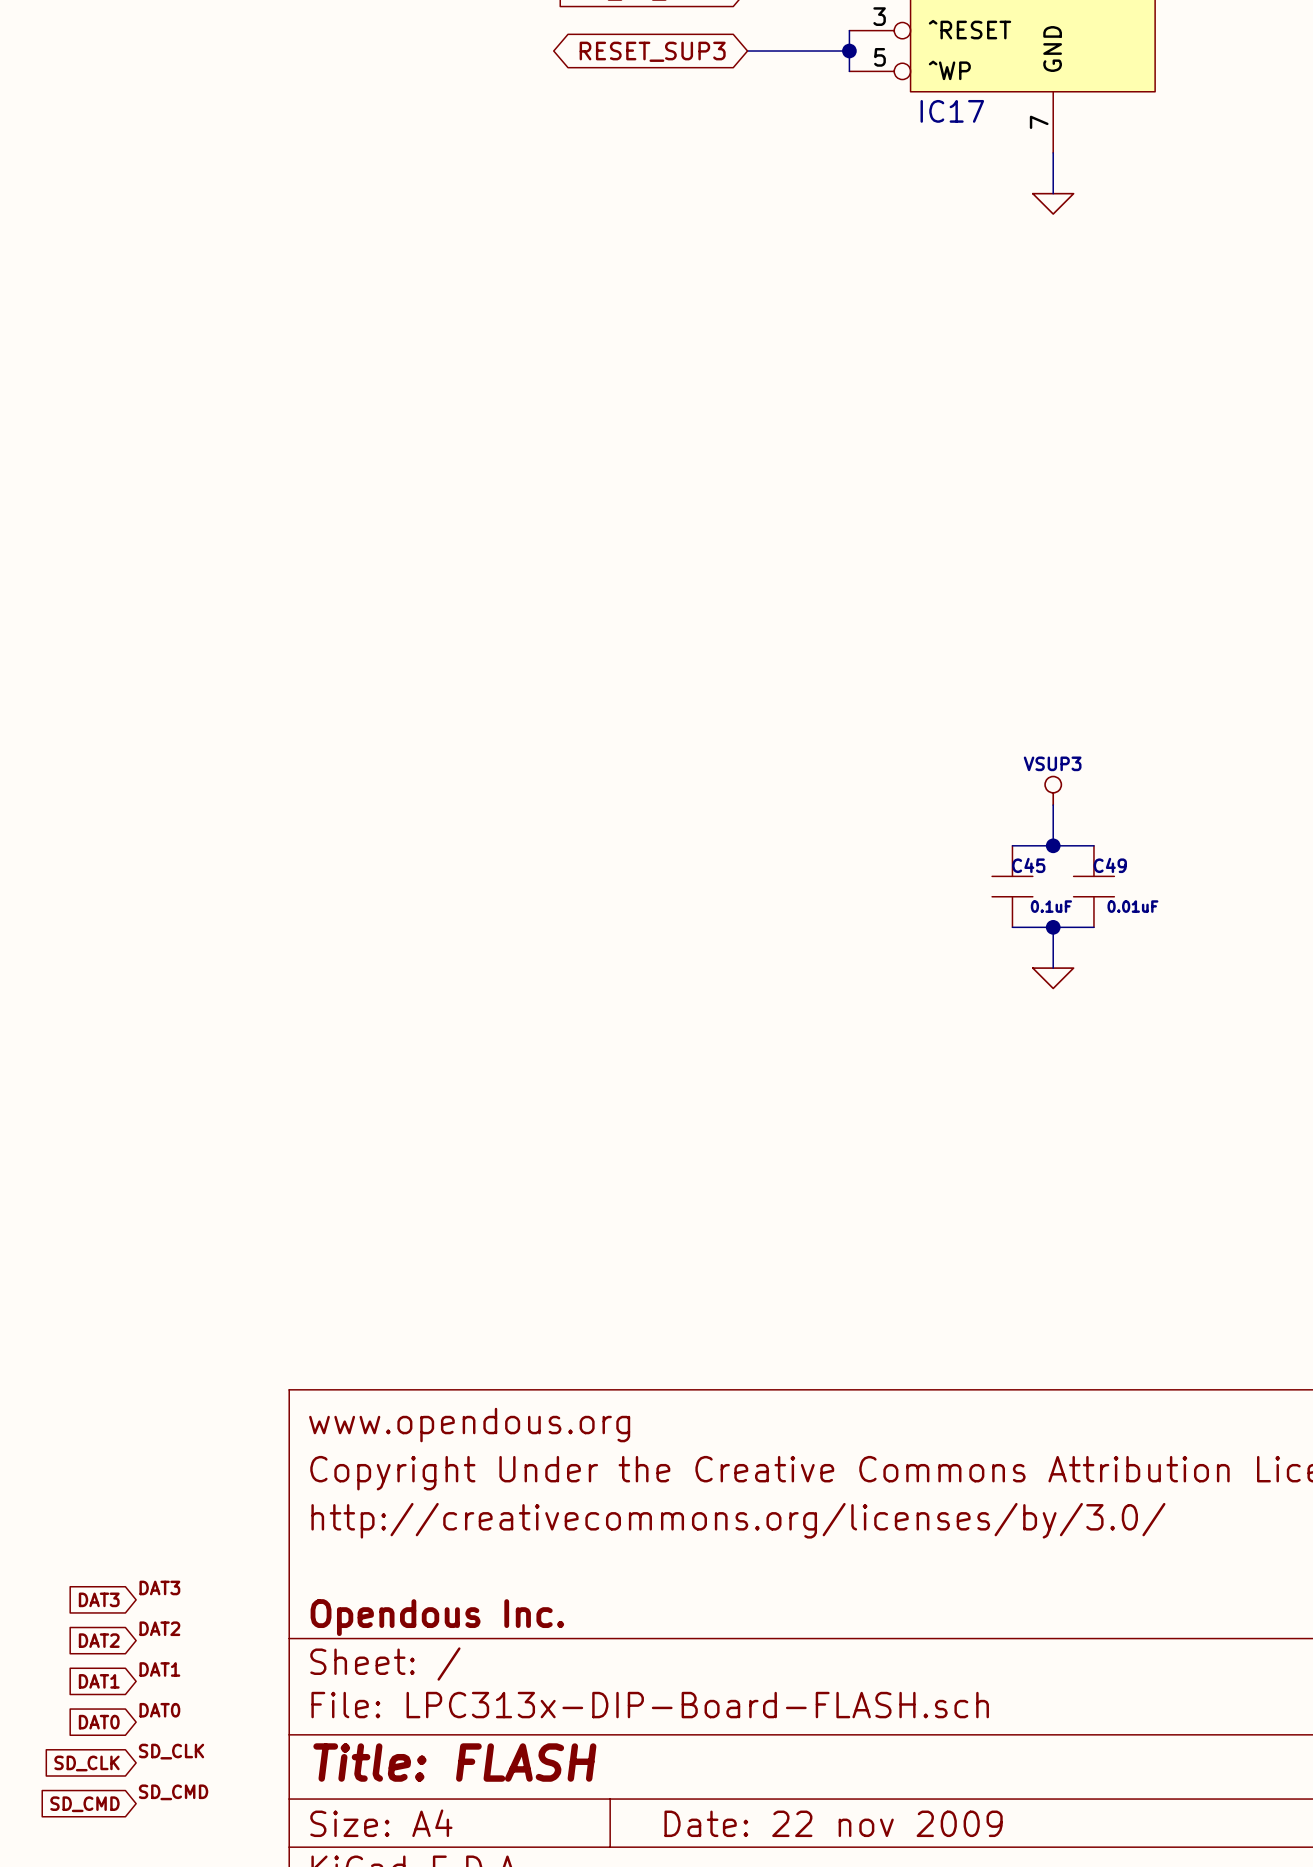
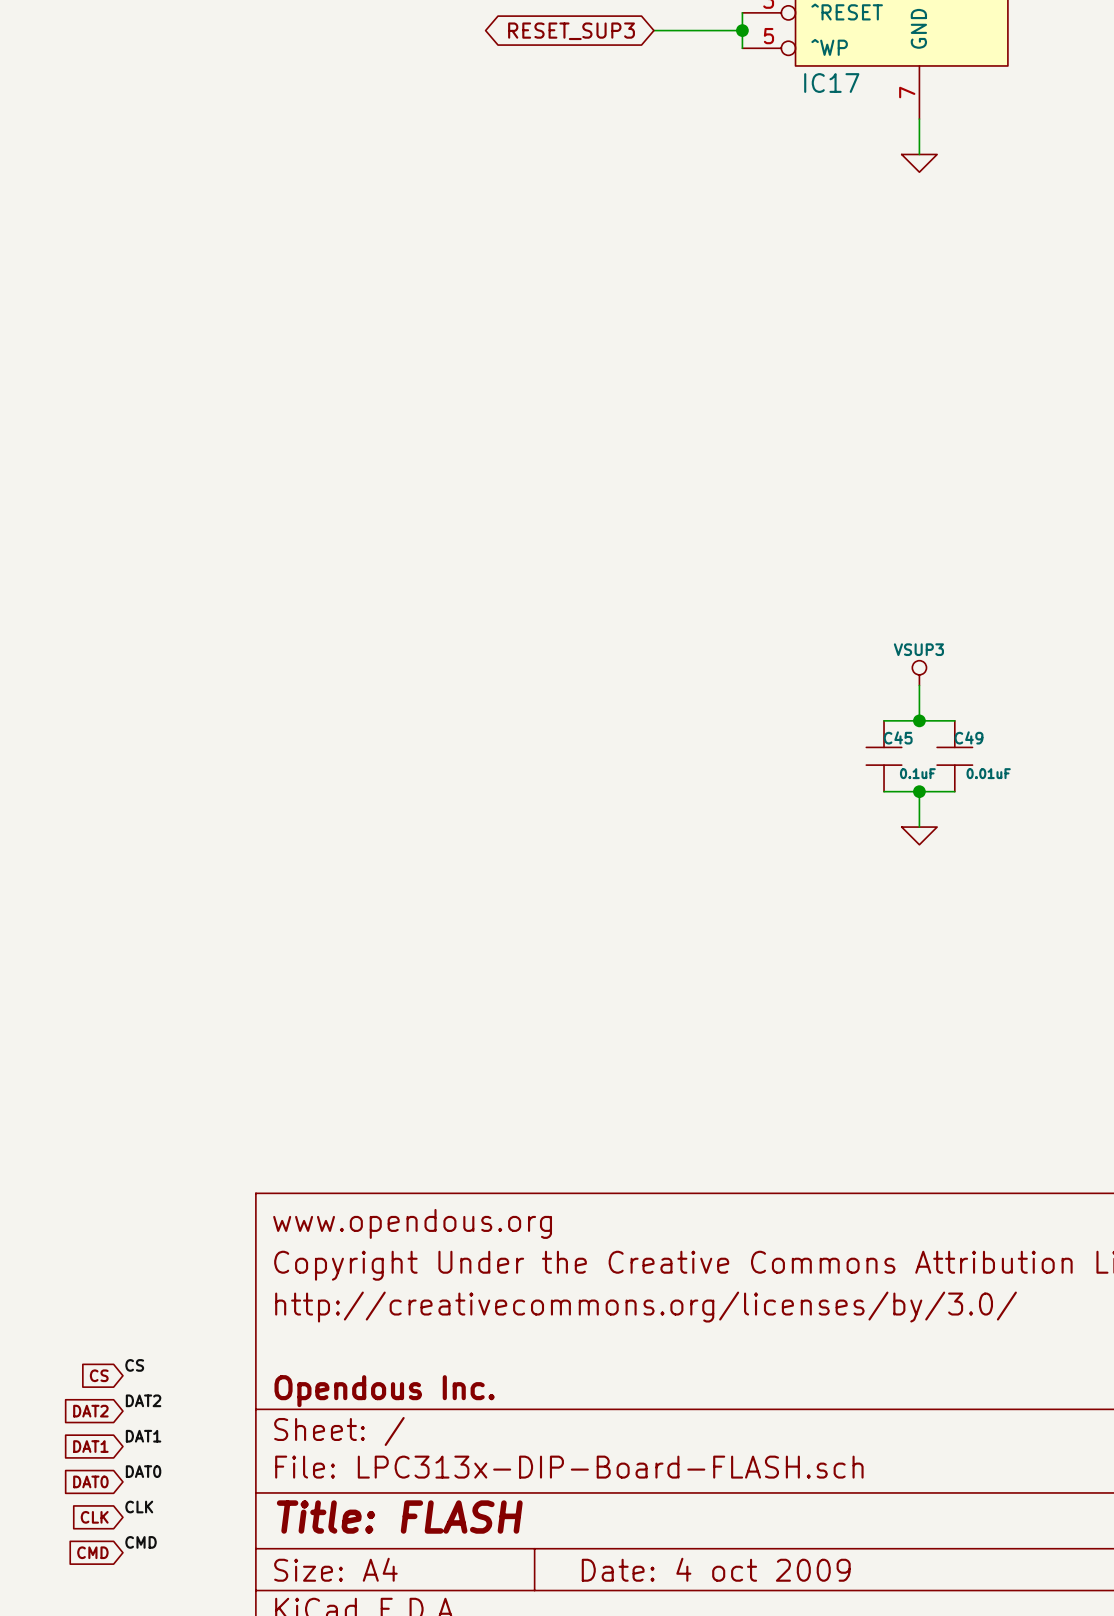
label: DAT3 (159, 1587) -> CS (134, 1365)
global label: DAT3 (99, 1599) -> CS (99, 1375)
label: SD_CLK (171, 1751) -> CLK (139, 1507)
global label: SD_CLK (86, 1763) -> CLK (94, 1517)
label: SD_CMD (173, 1792) -> CMD (141, 1542)
global label: SD_CMD (84, 1804) -> CMD (92, 1552)
title block: Date: 22 nov 2009 (833, 1823) -> Date: 4 oct 2009 (716, 1569)

